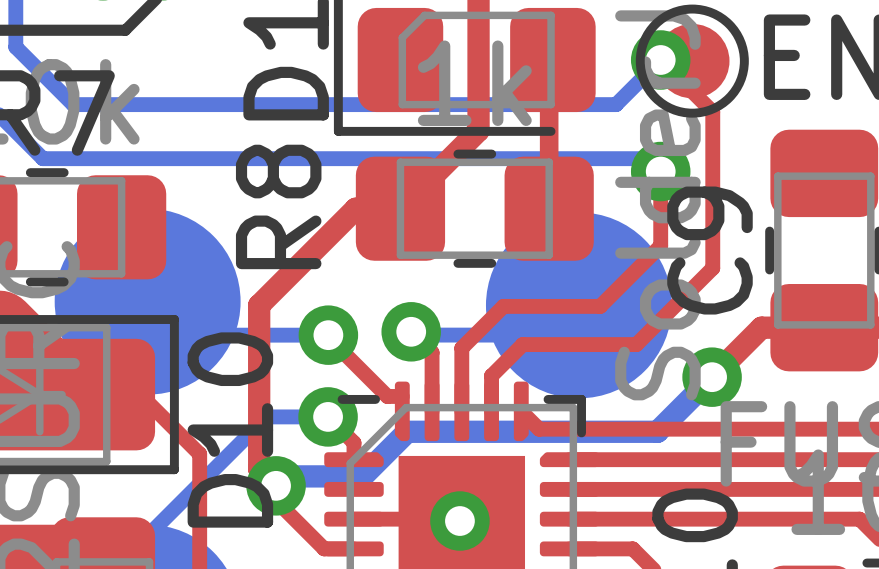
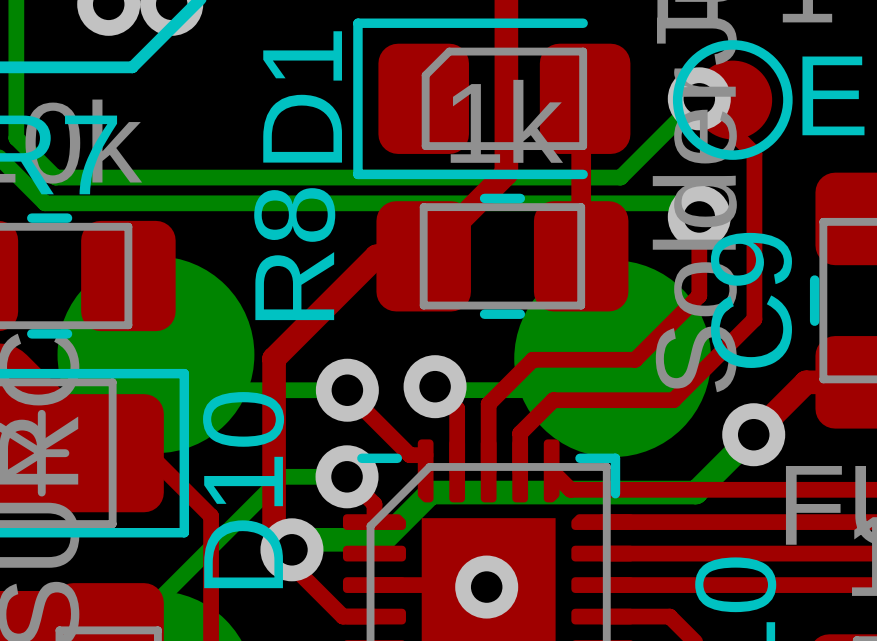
bottom track: (15, 47) (73, 104) (616, 104) -> (16, 85) (16, 138) (55, 177) (620, 177) (652, 146)

